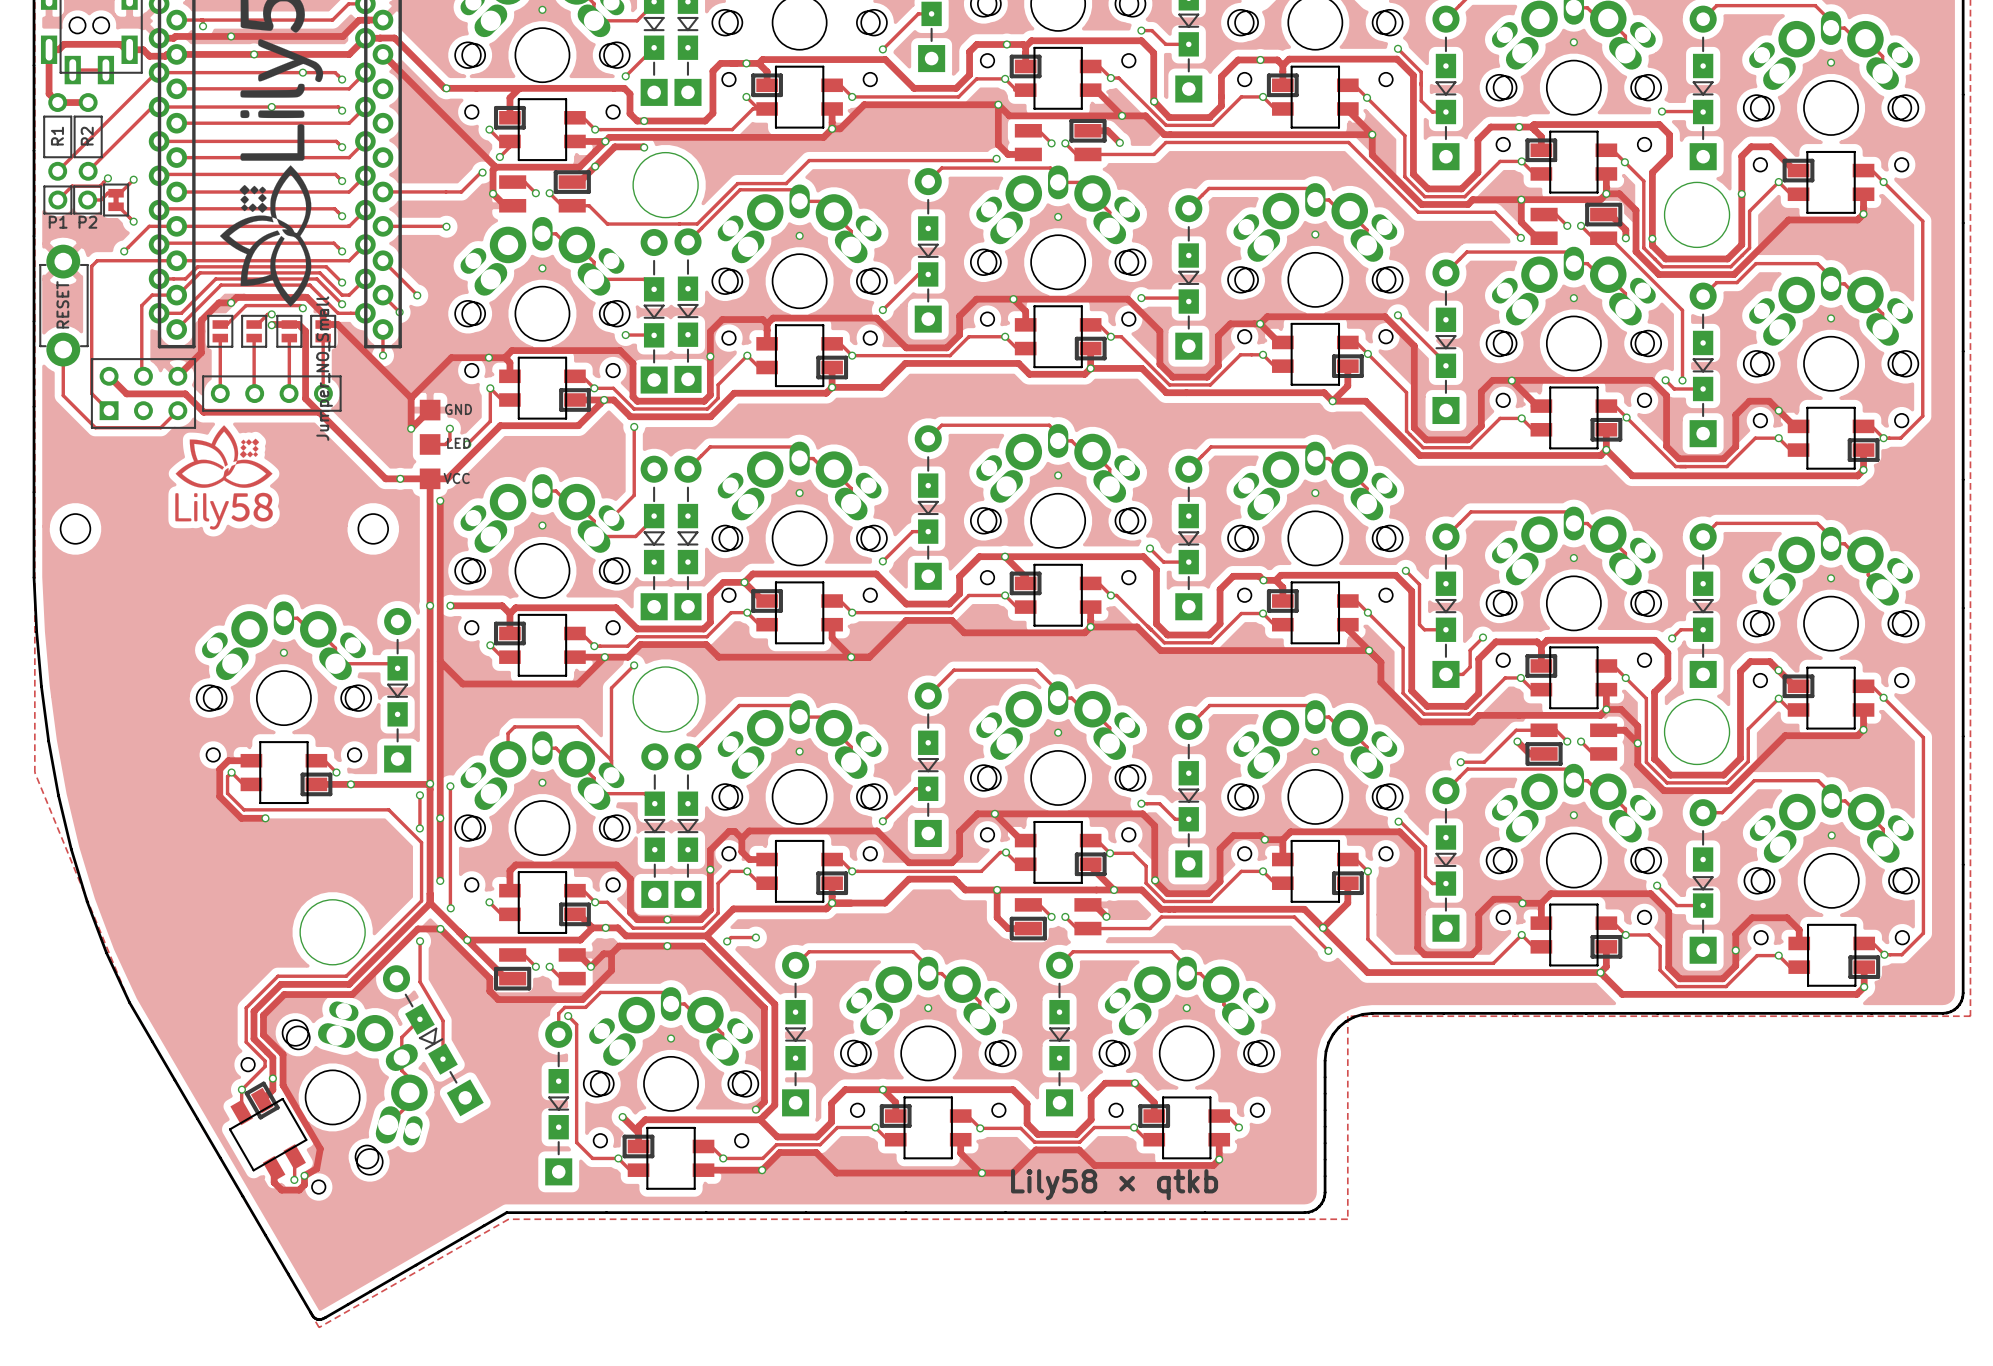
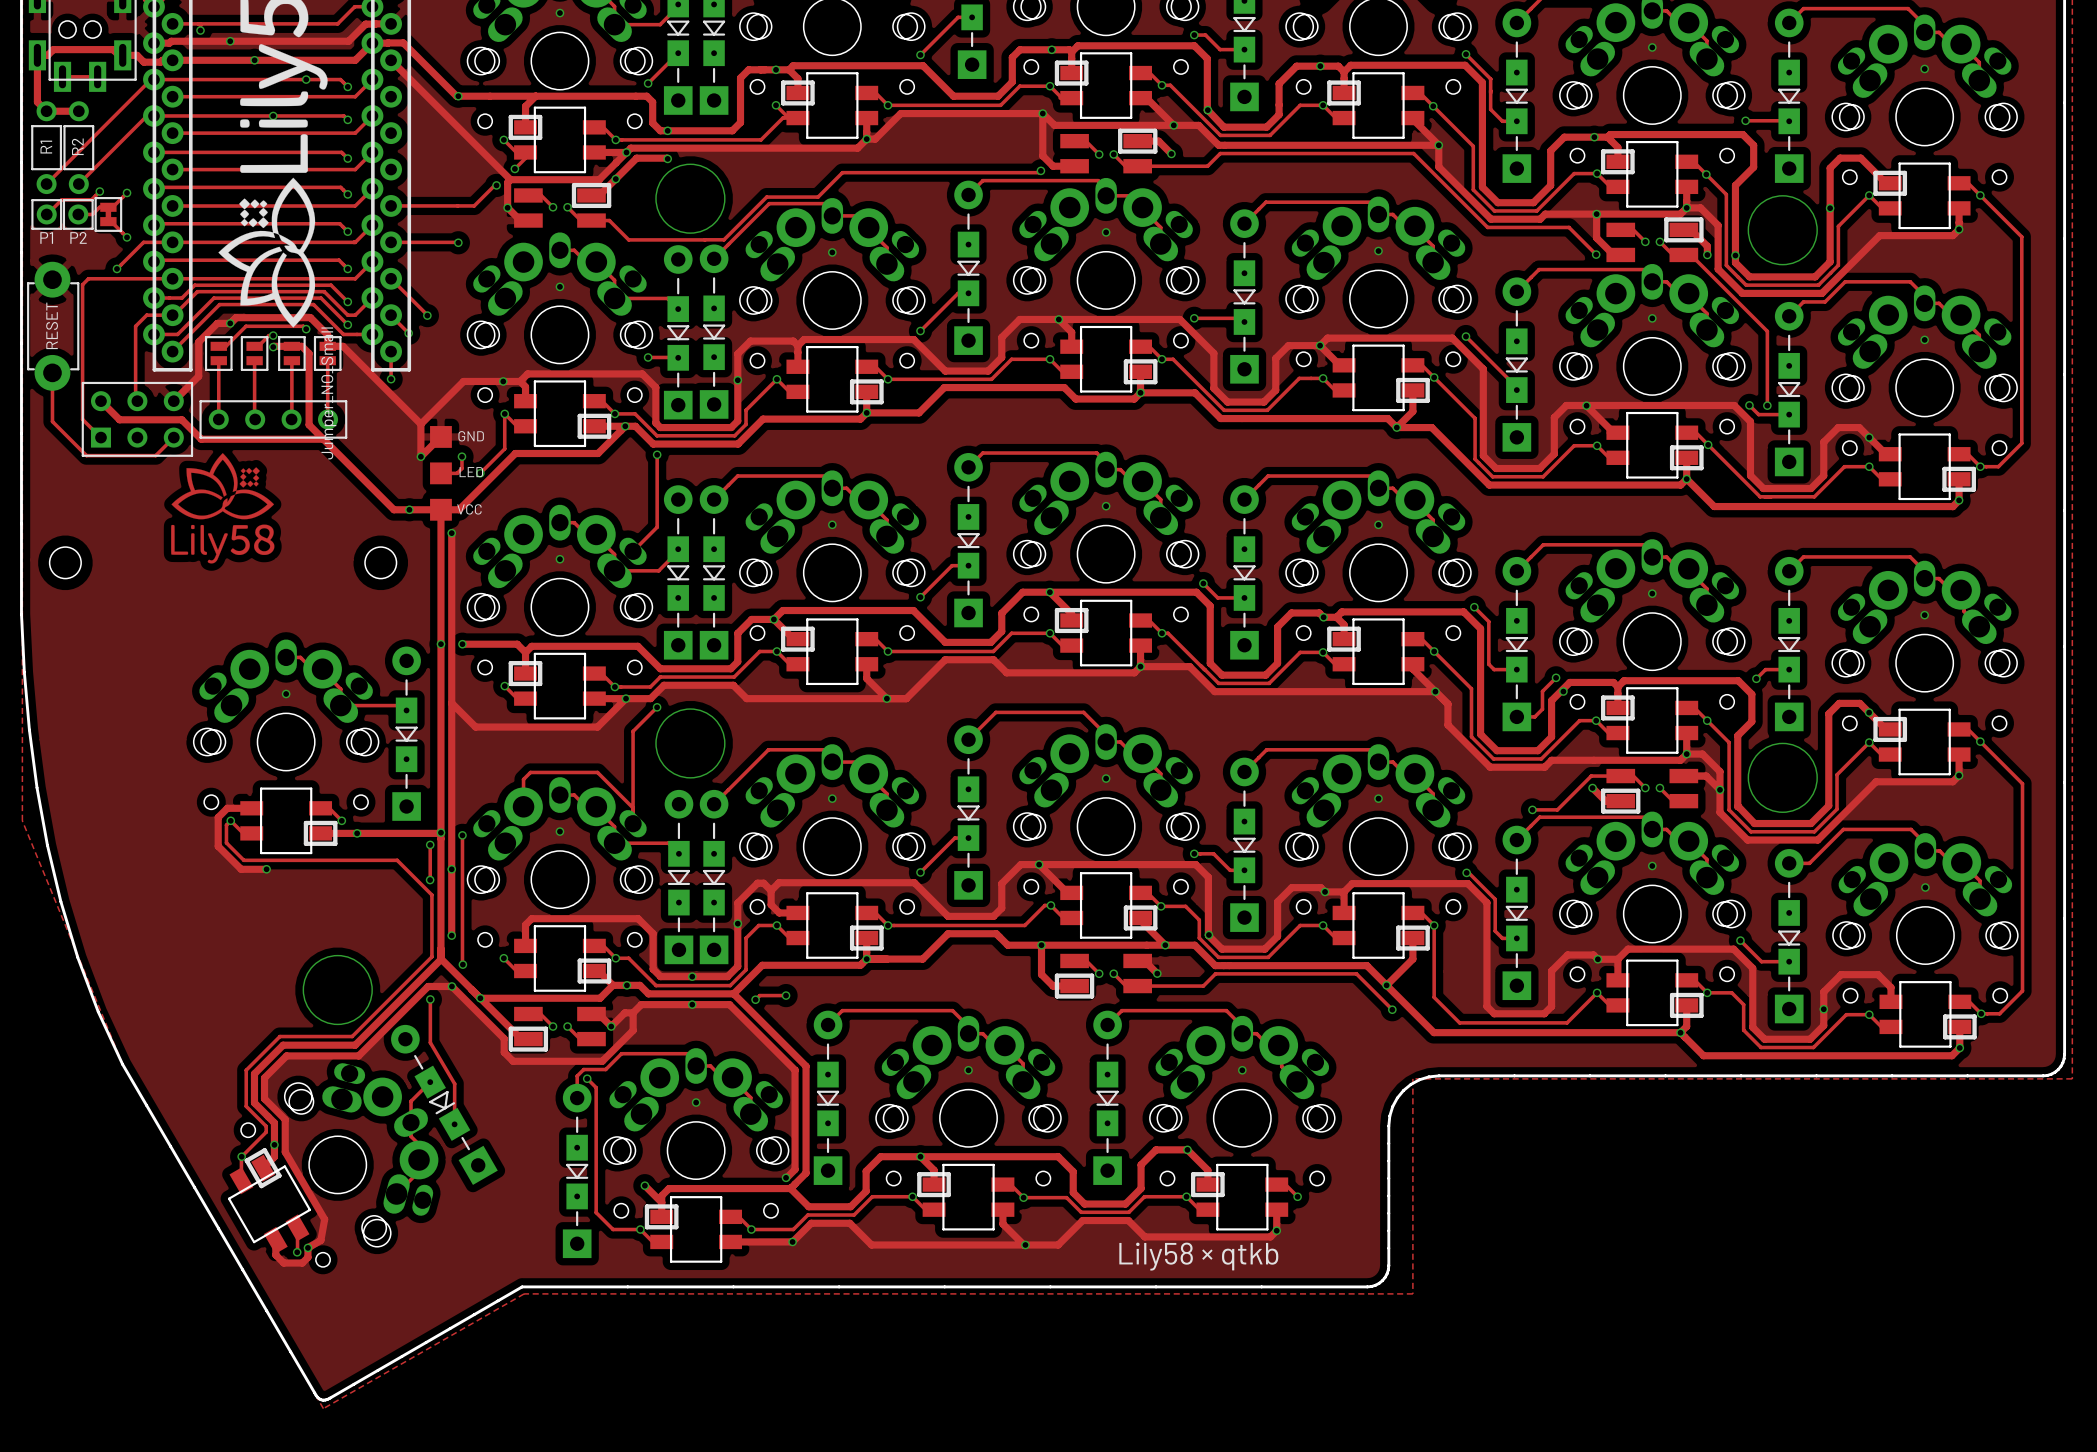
via: none -> (1563, 691)

